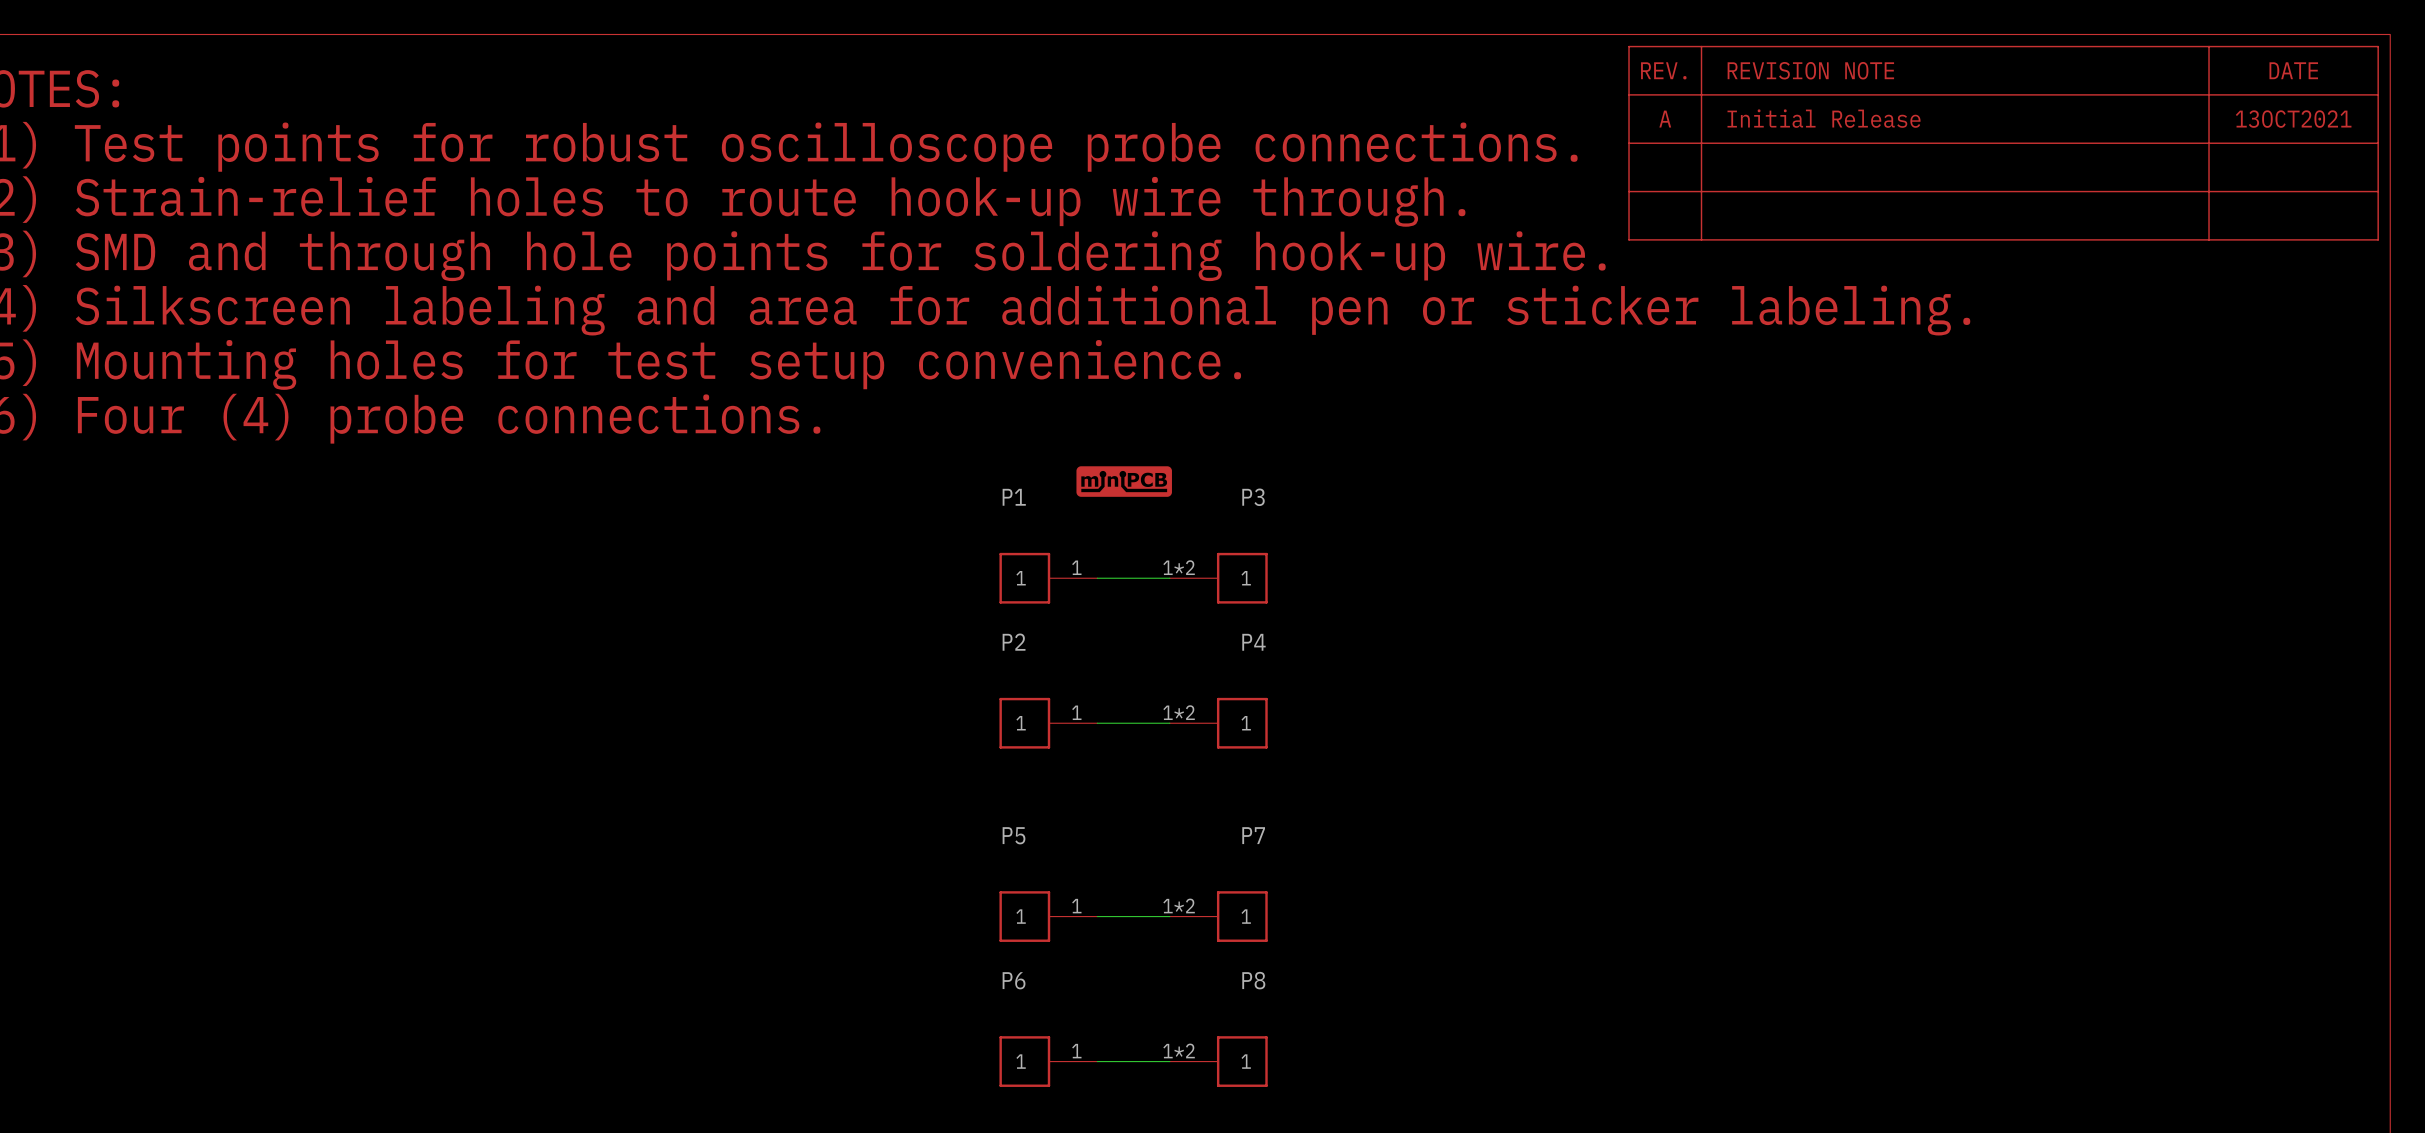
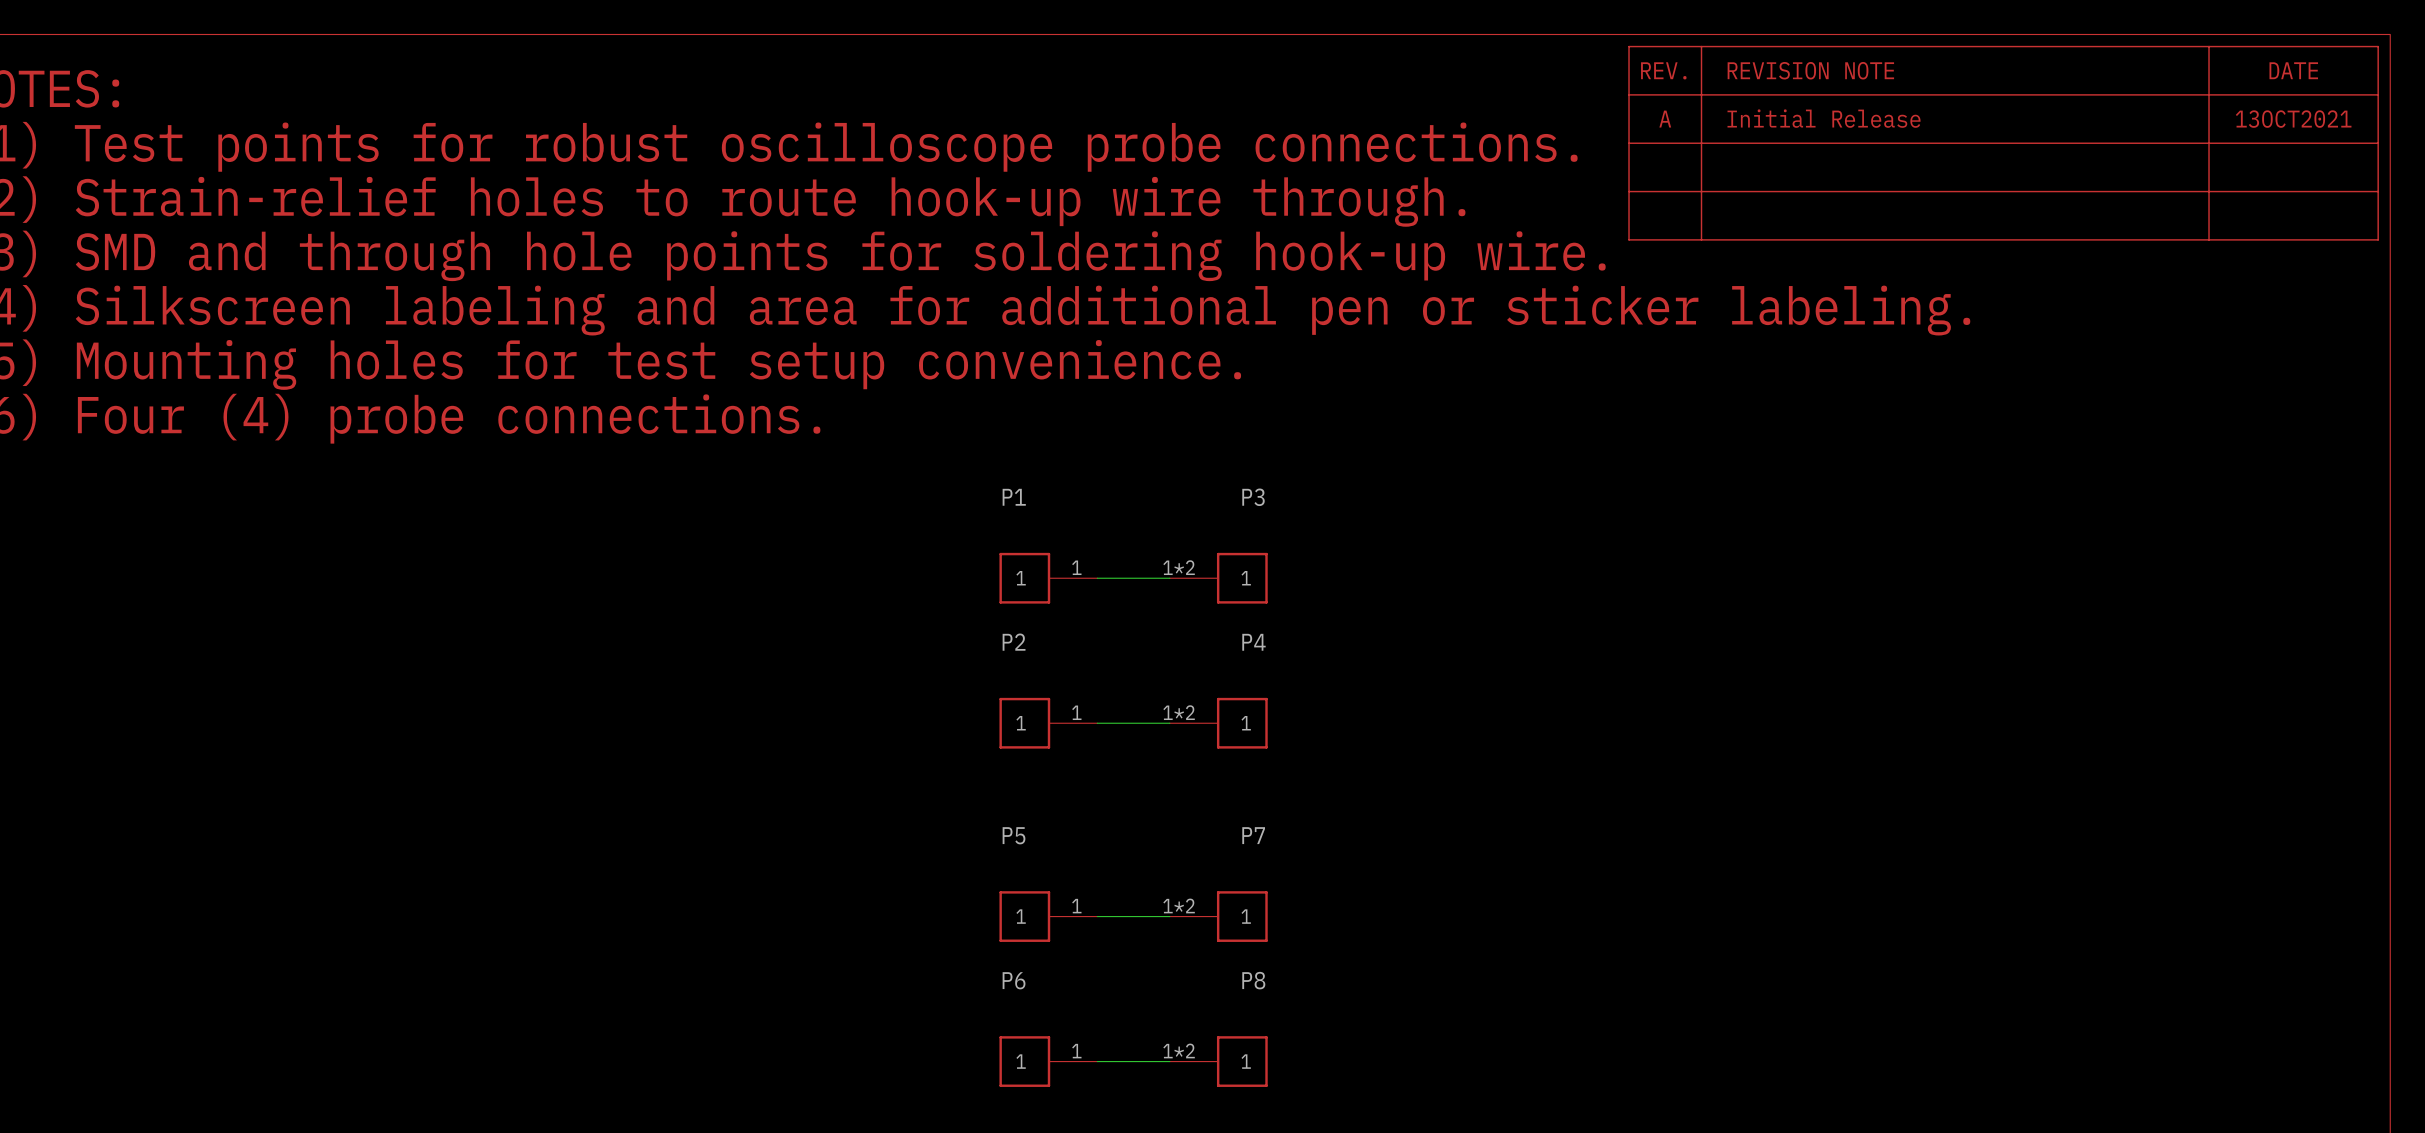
part: (1124, 481) -> none

